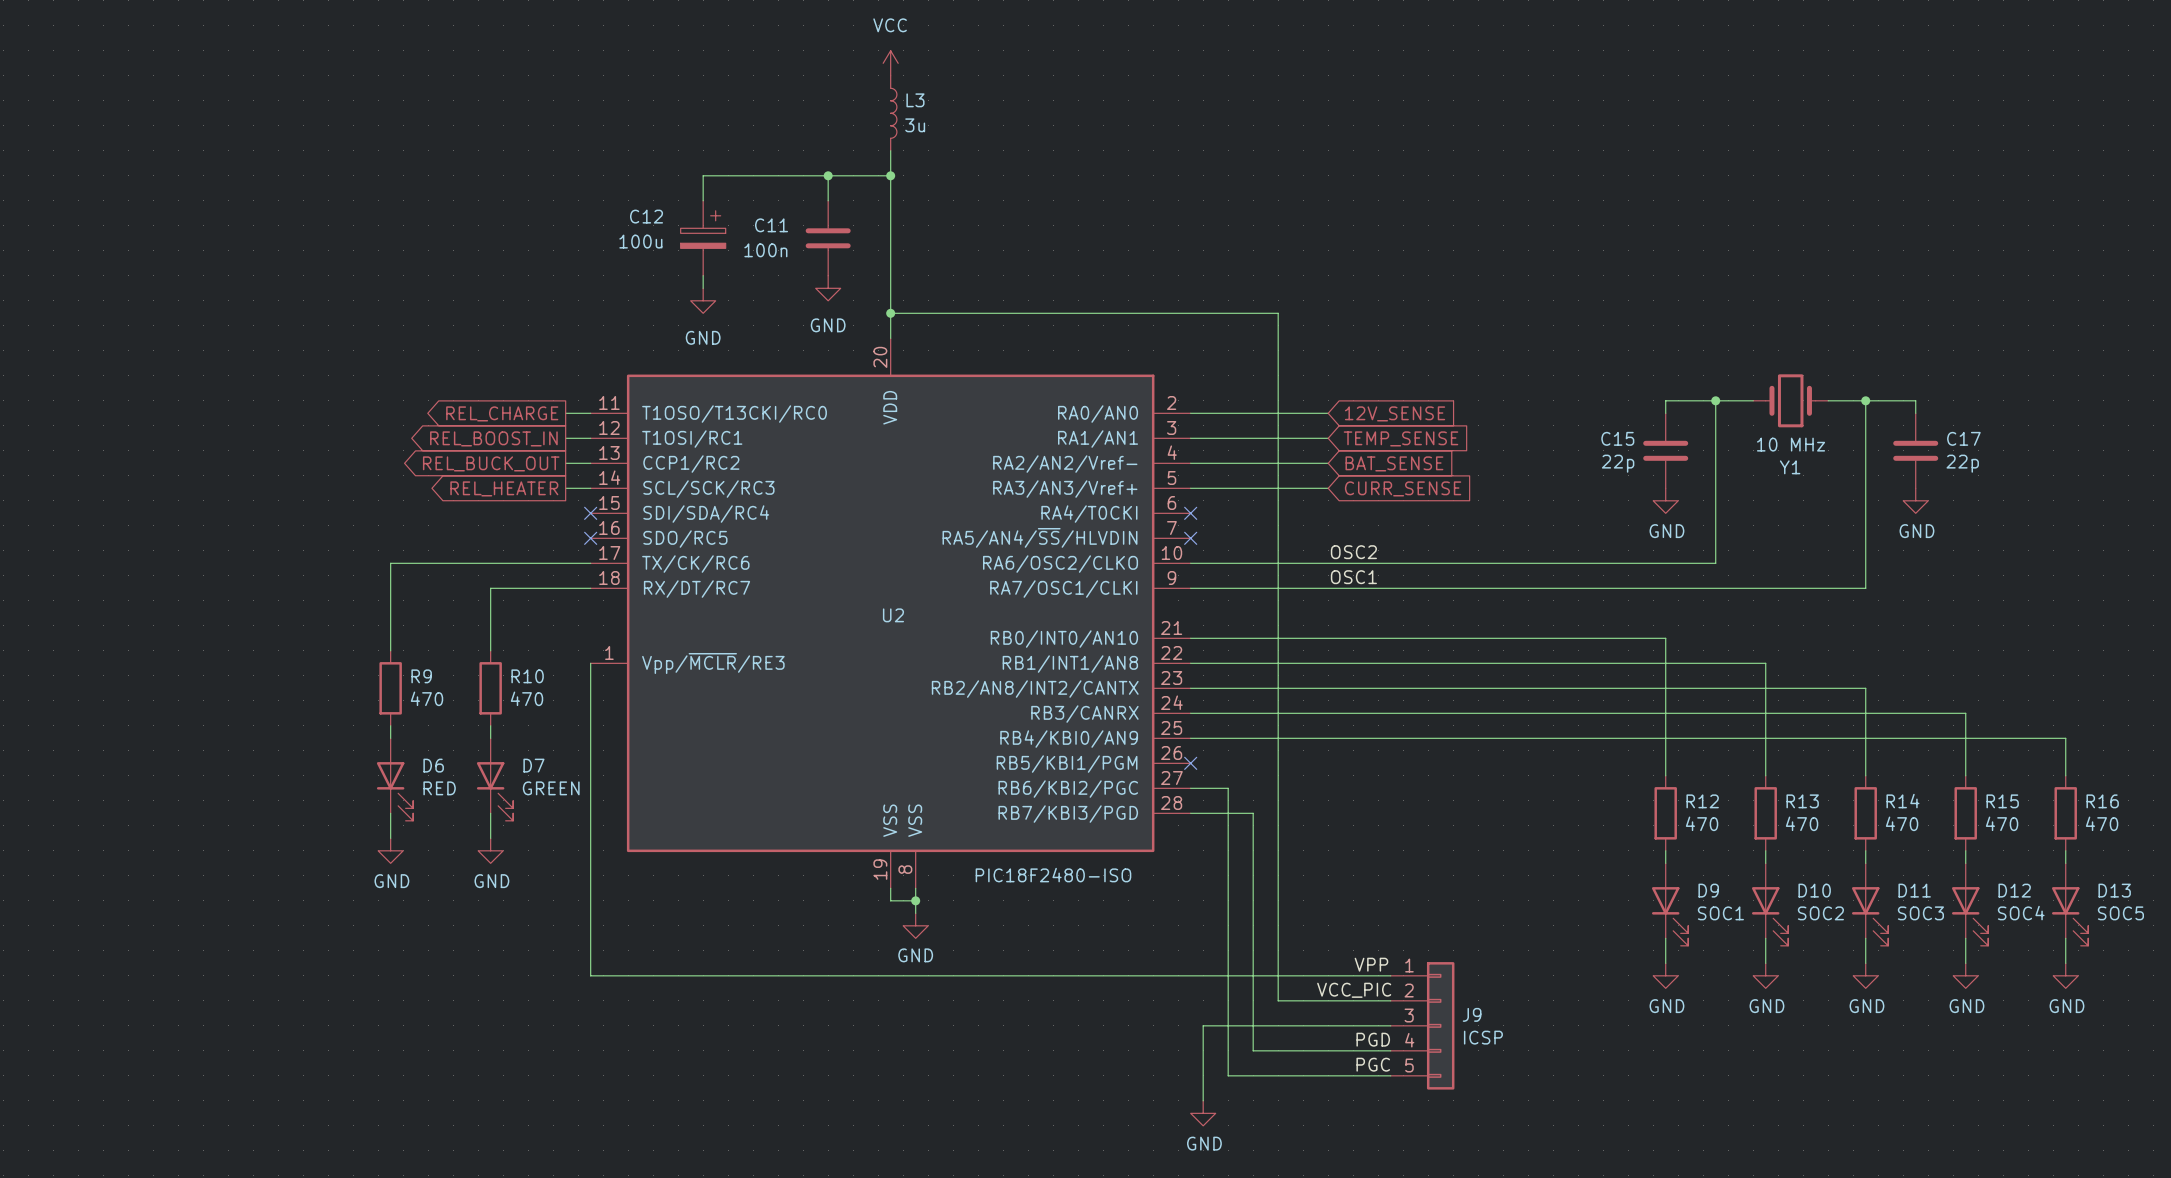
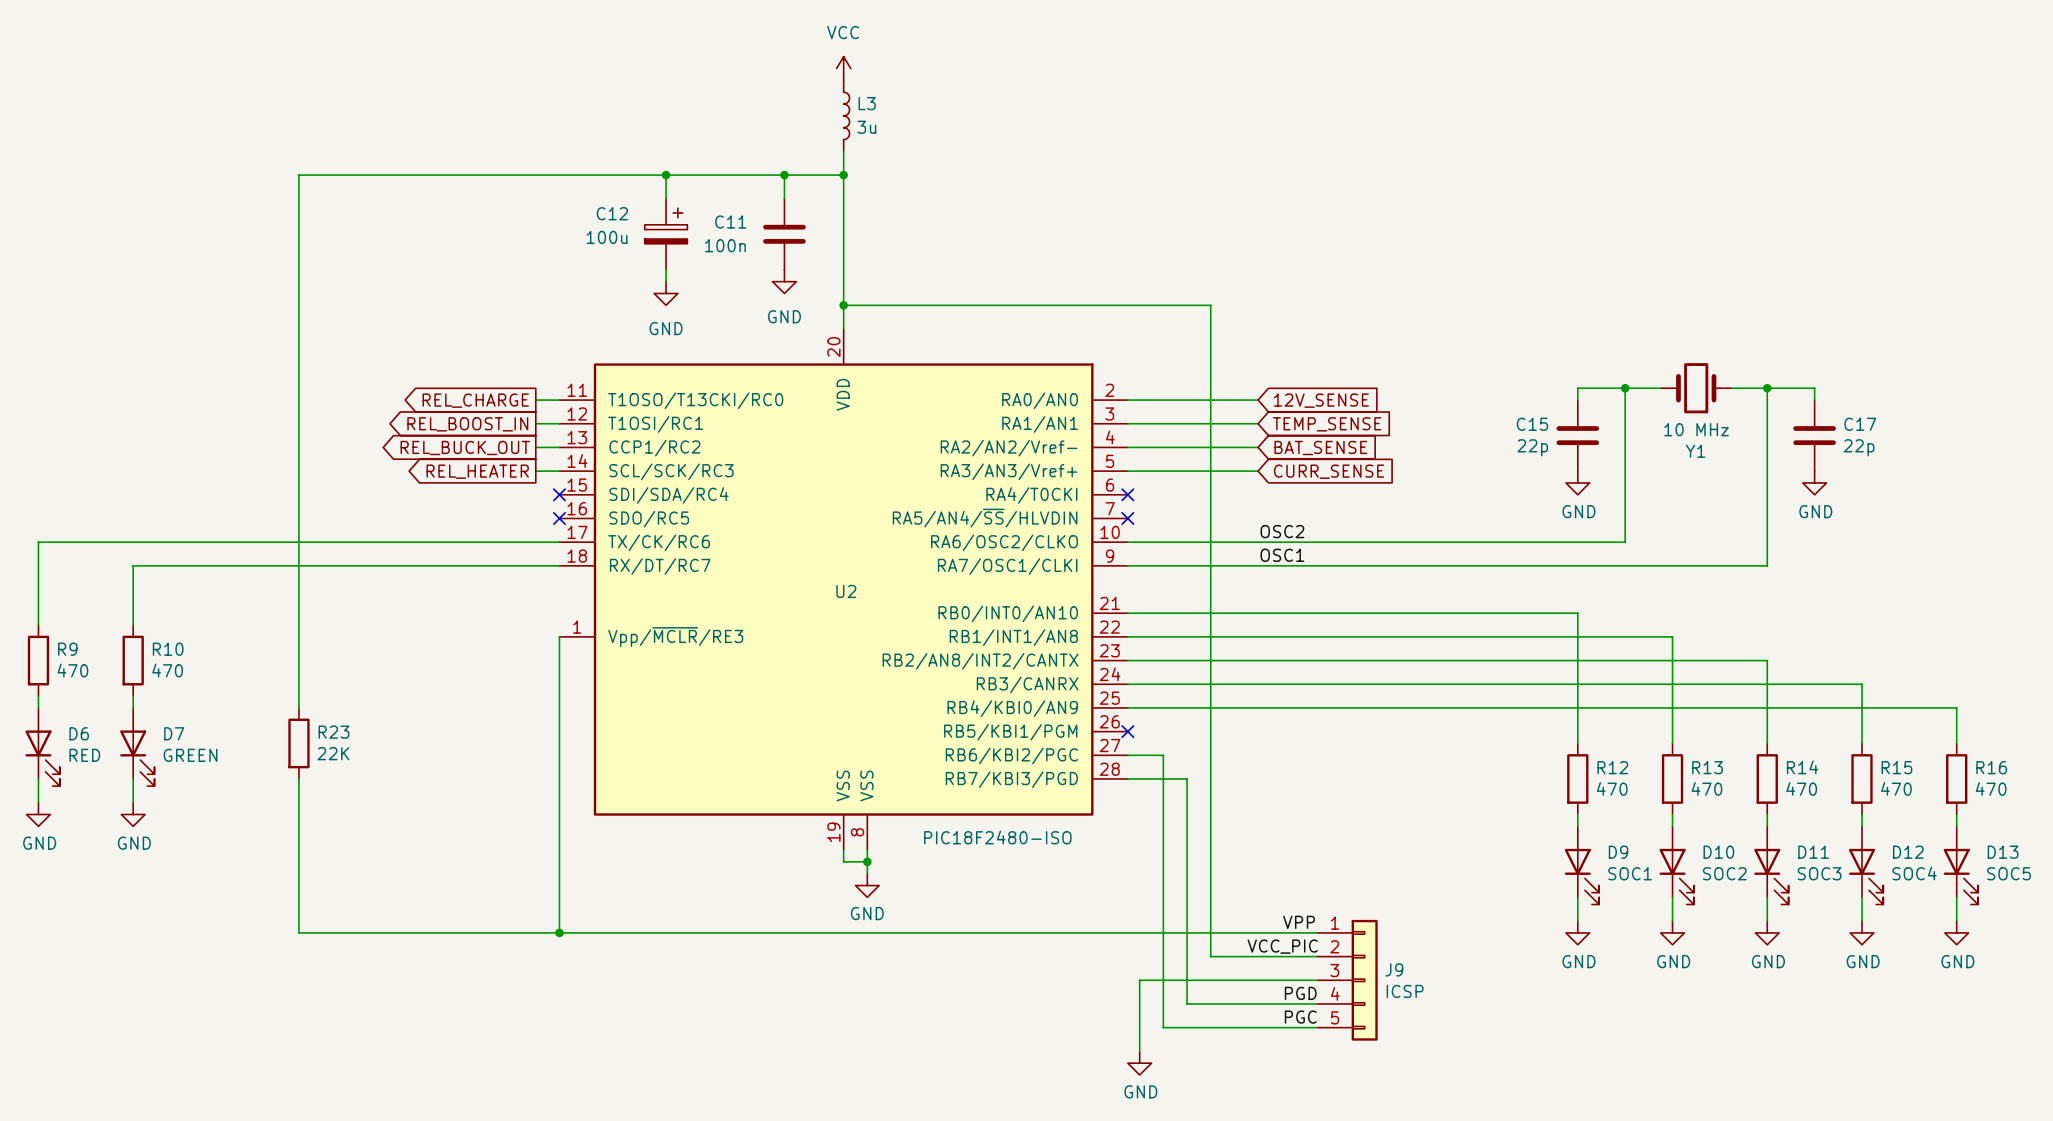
wire: none -> (666, 175) (298, 175) (298, 707)
junction: none -> (666, 175)
wire: (390, 563) (390, 650) -> (370, 542) (38, 542) (38, 625)
wire: (490, 588) (490, 650) -> (464, 565) (133, 565) (133, 625)
R9 position: (390, 688) -> (38, 660)
R10 position: (490, 688) -> (133, 660)
wire: none -> (38, 696) (38, 707)
wire: none -> (133, 696) (133, 707)
wire: (390, 725) (390, 738) -> none
wire: (490, 725) (490, 738) -> none
R23: none -> 22K (298, 743)
D6 position: (395, 779) -> (42, 747)
D7 position: (495, 779) -> (137, 747)
wire: none -> (38, 778) (38, 802)
wire: none -> (133, 778) (133, 802)
wire: none -> (298, 778) (298, 932) (559, 932)
wire: (390, 813) (390, 838) -> none
wire: (490, 813) (490, 838) -> none
power symbol: none -> GND (38, 814)
power symbol: none -> GND (133, 814)
power symbol: GND (390, 850) -> none
power symbol: GND (490, 850) -> none
junction: none -> (559, 932)

